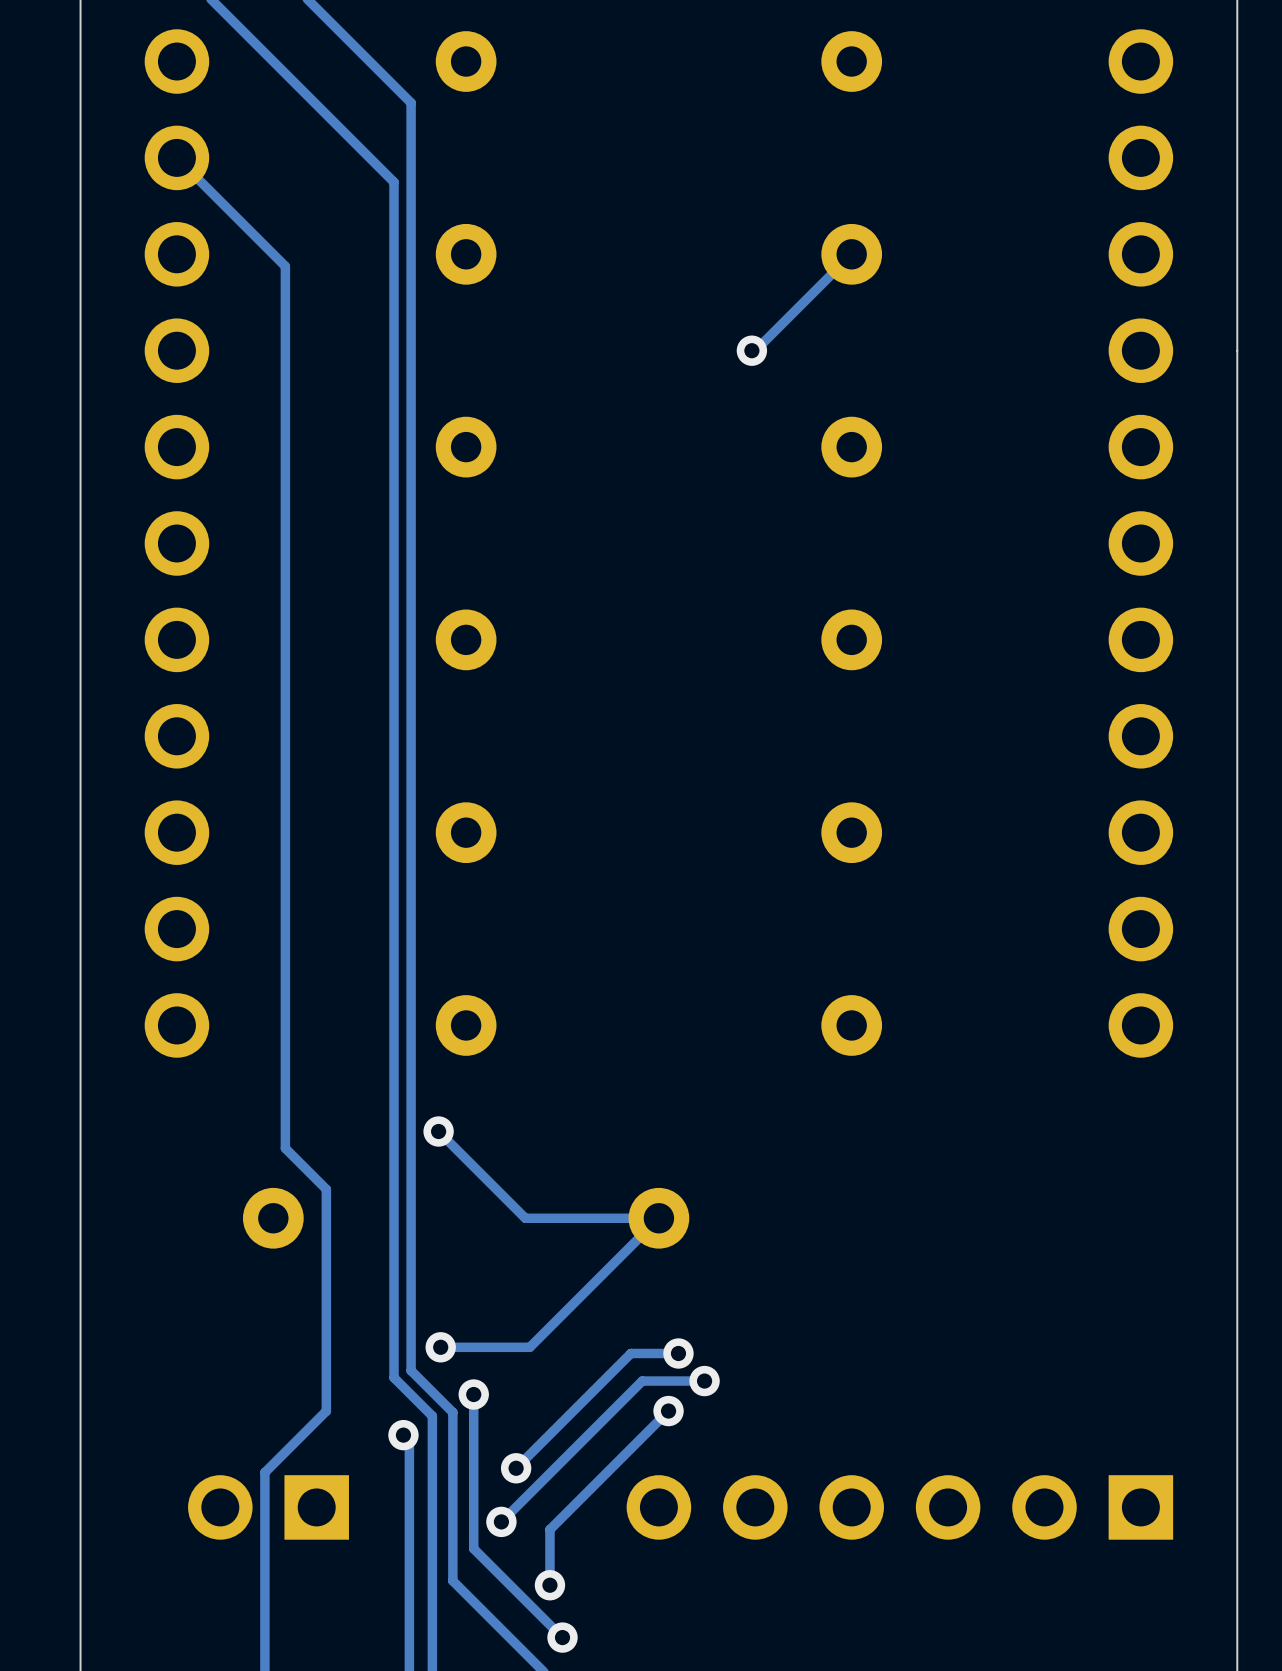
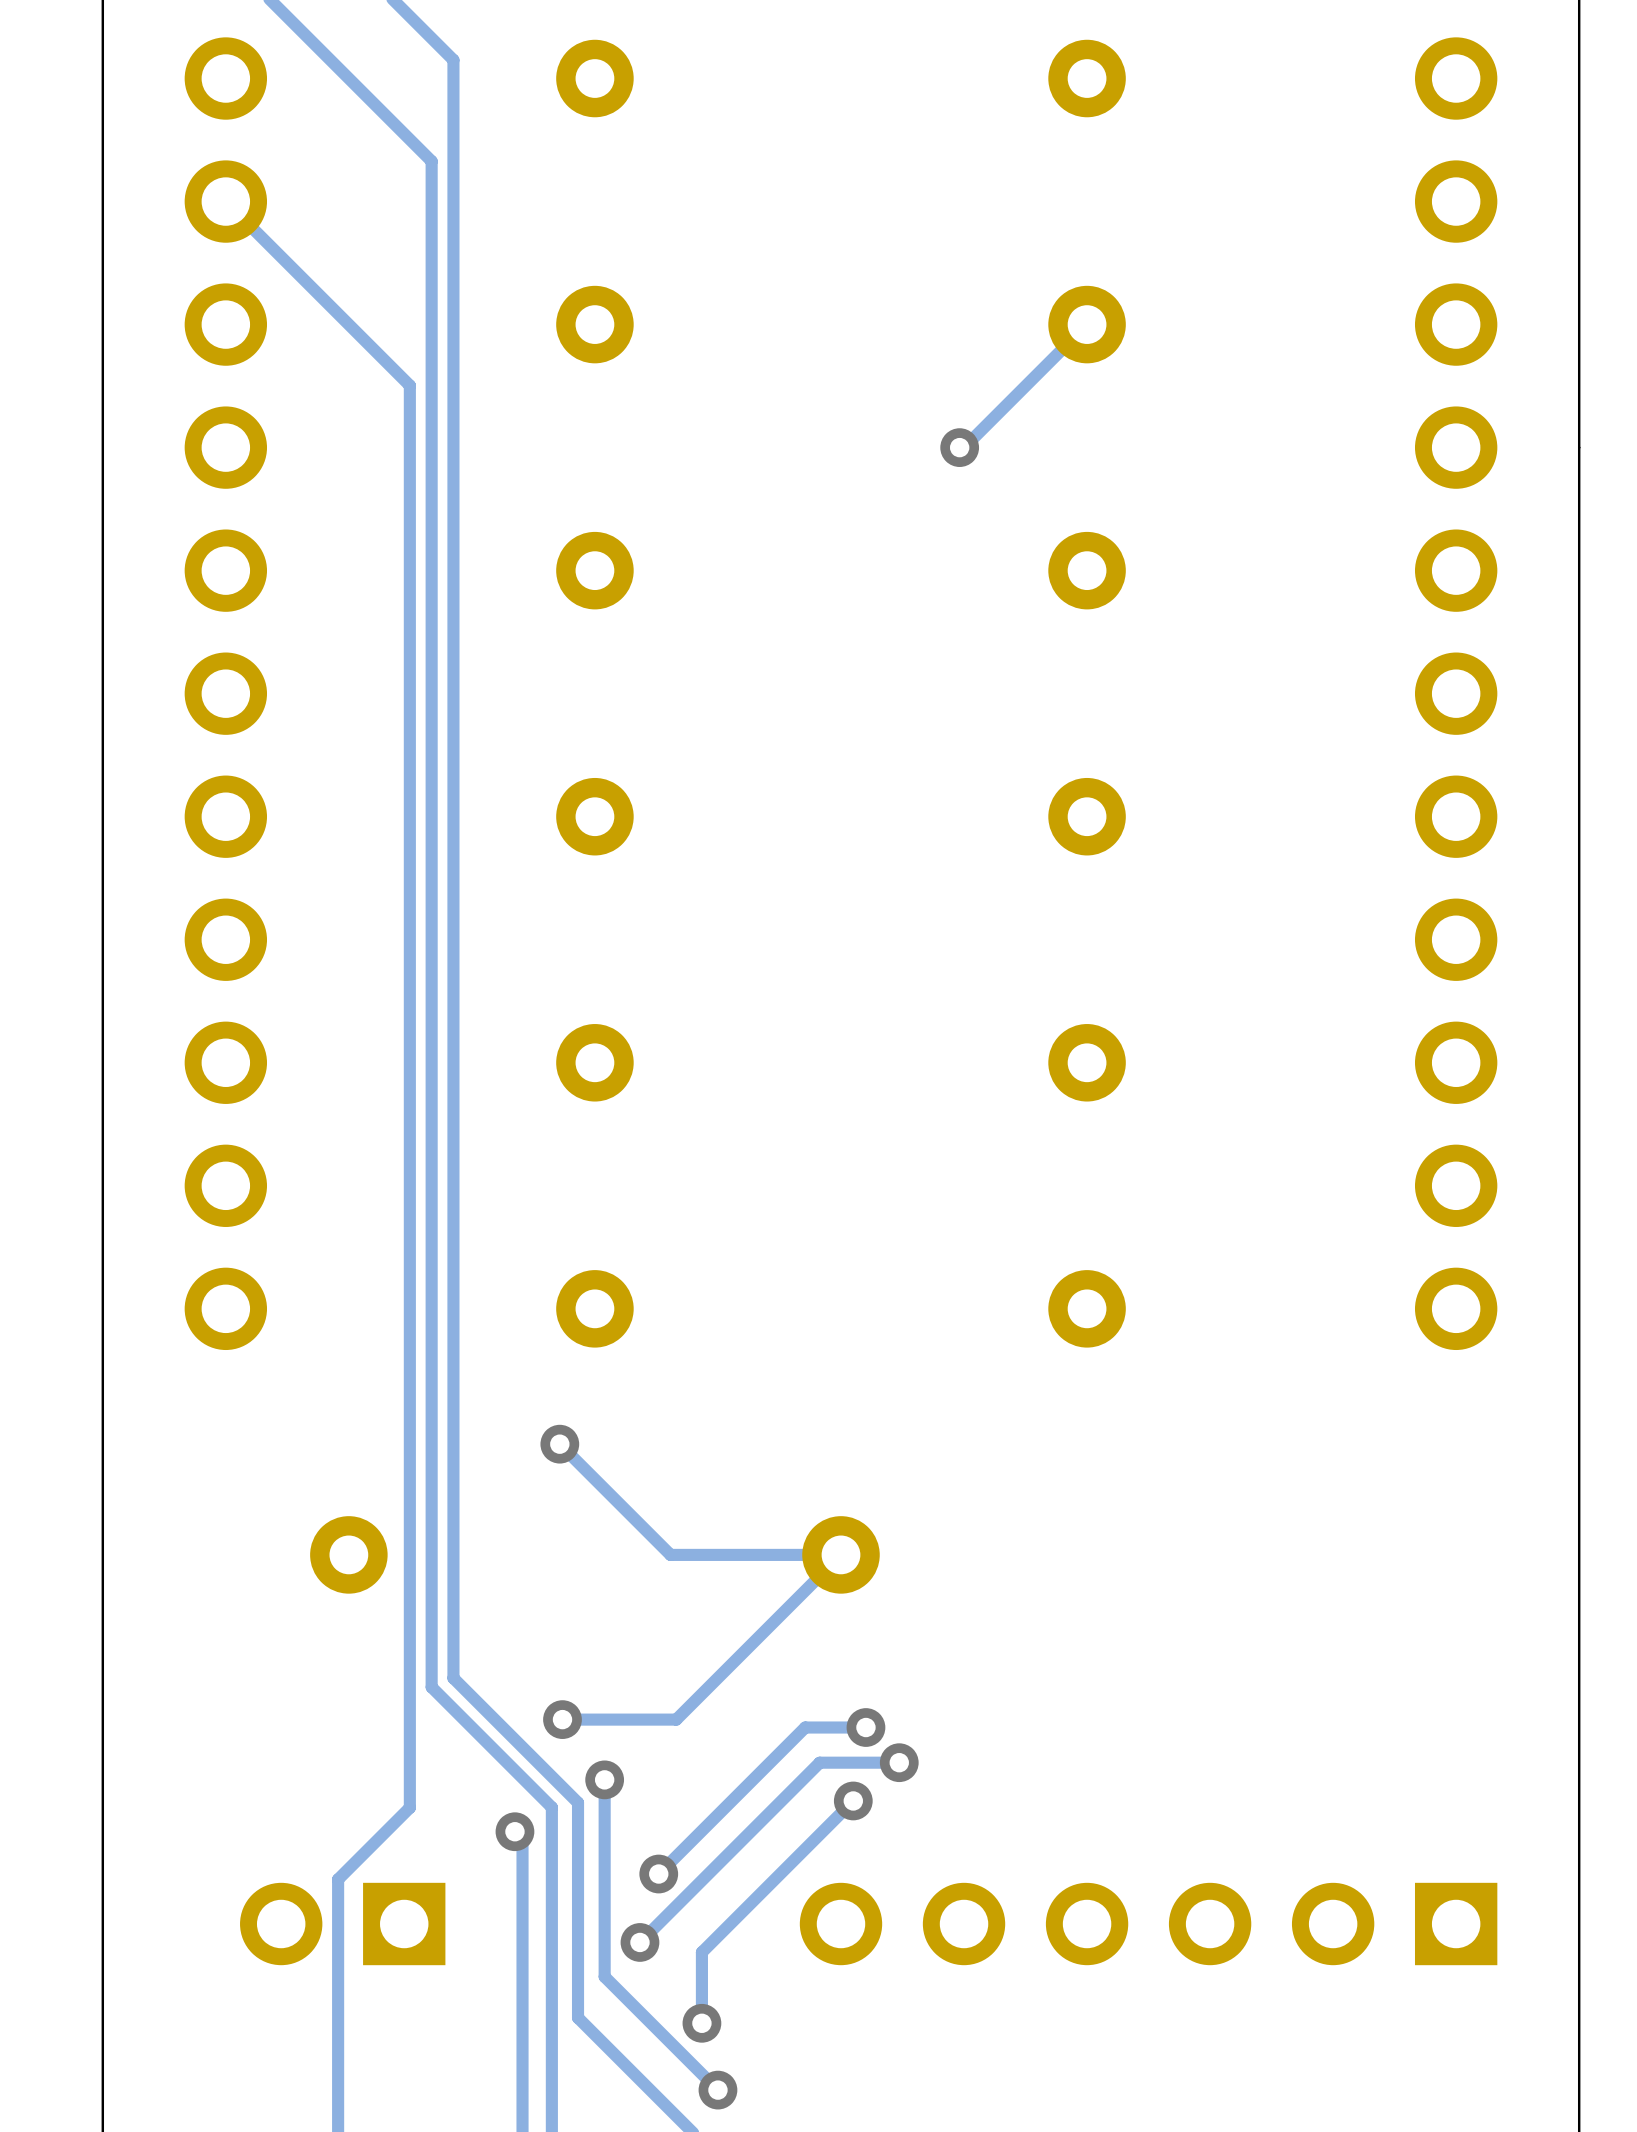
track: (355, 47) (411, 102) (411, 1370) -> (453, 60) (453, 1678) (524, 1749)
track: (338, 126) (394, 182) (394, 1377) -> (431, 161) (431, 1687) (502, 1758)
track: (285, 266) (285, 1148) (326, 1189) (326, 1411) (321, 1416) -> (364, 339) (409, 385) (409, 1807)

